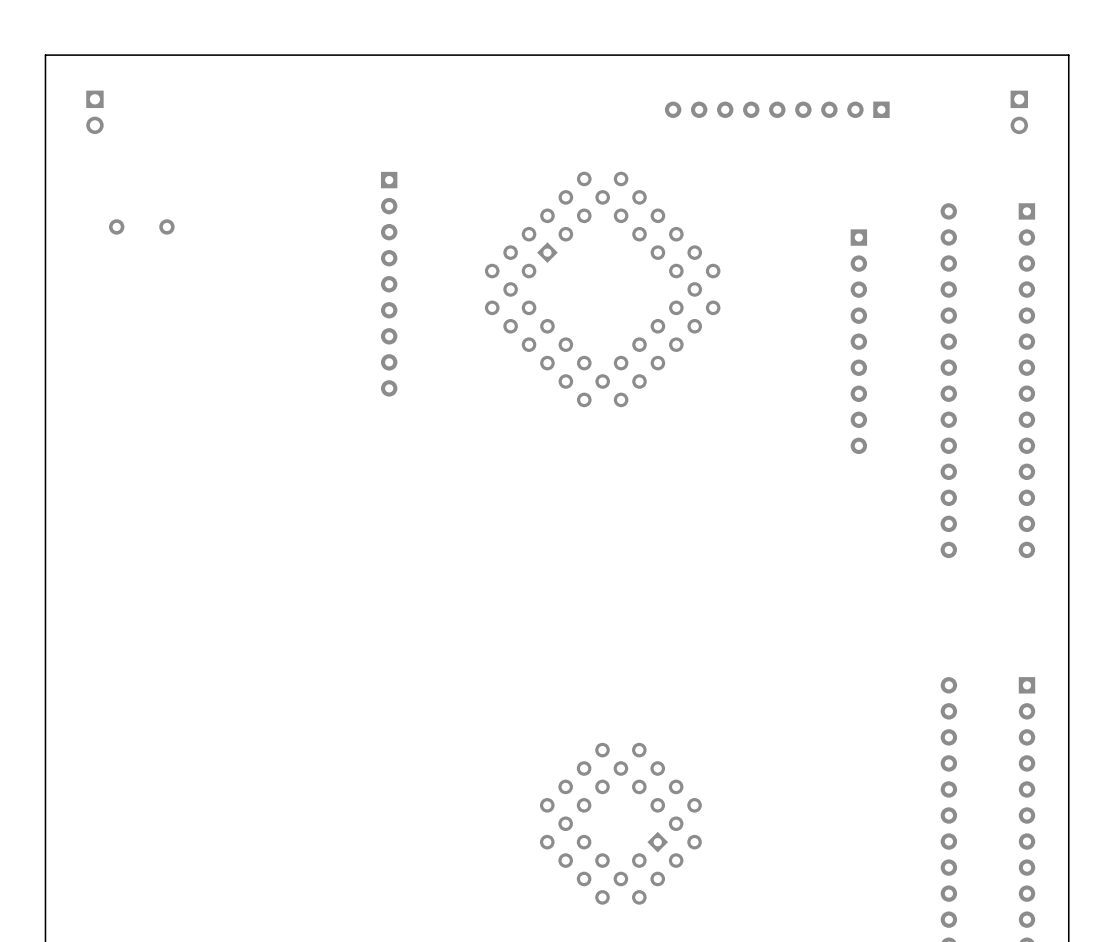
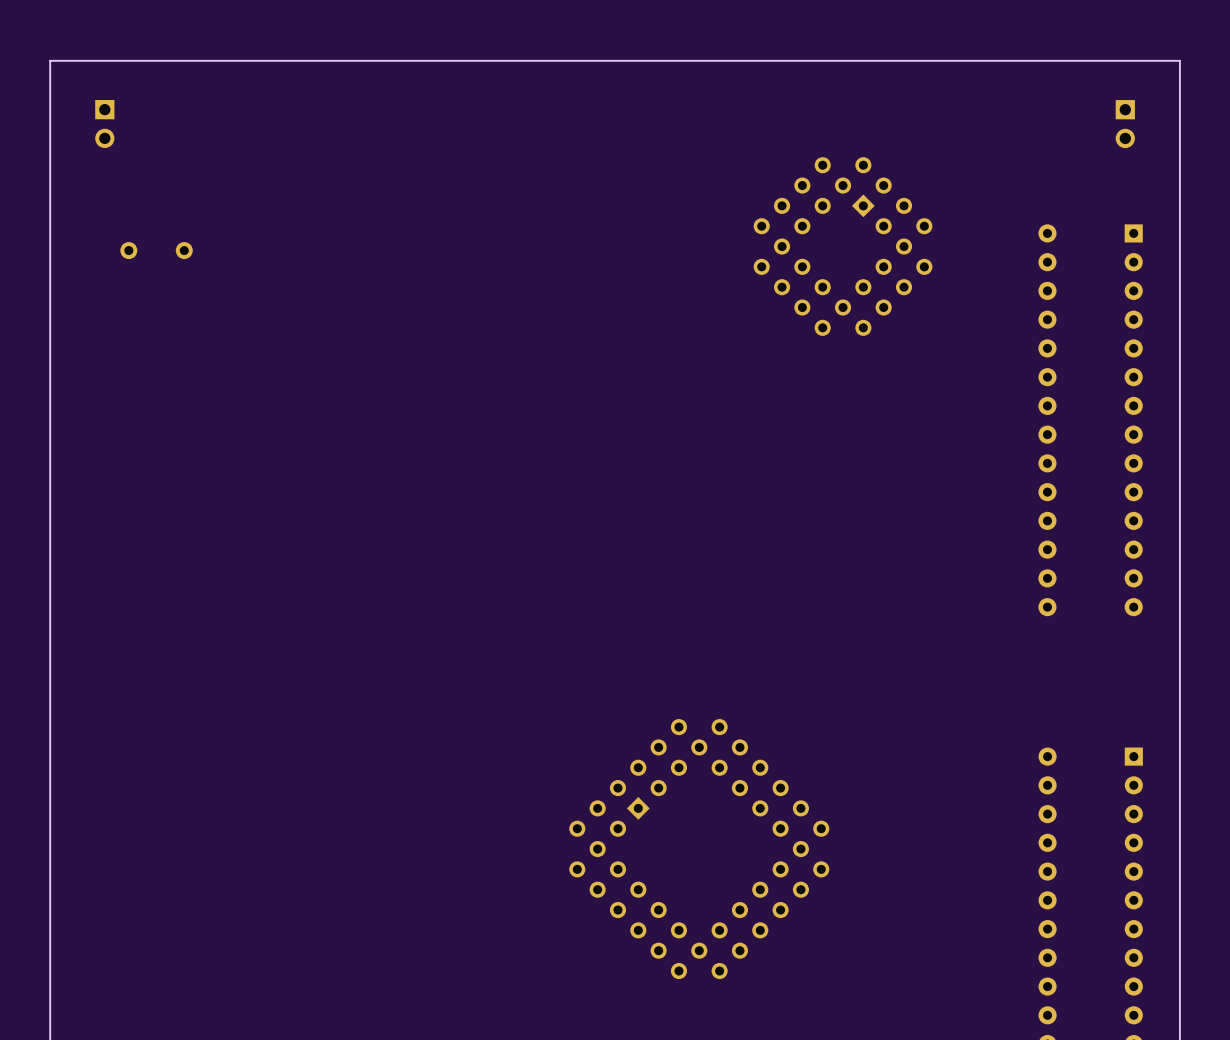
part: (777, 109) -> none
part: none -> (843, 246)
part: (389, 284) -> none
part: (602, 289) -> none
part: (858, 341) -> none
part: none -> (699, 849)
part: (620, 823) -> none

